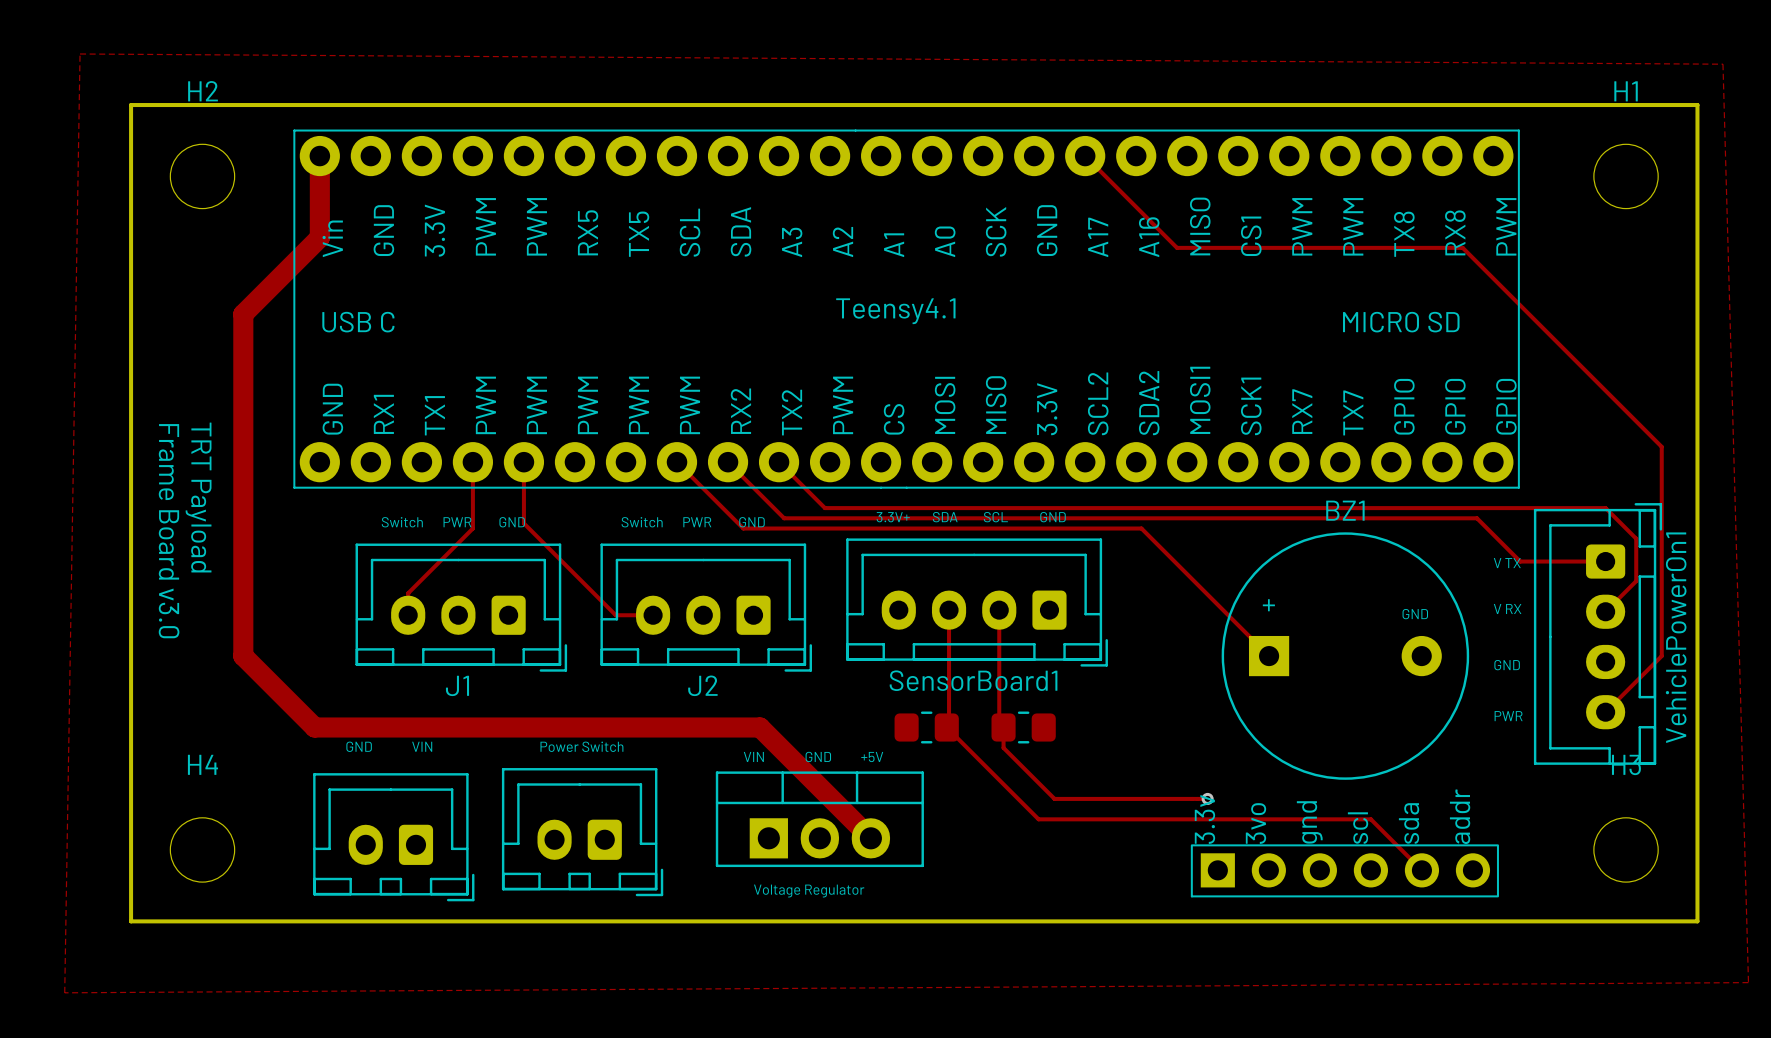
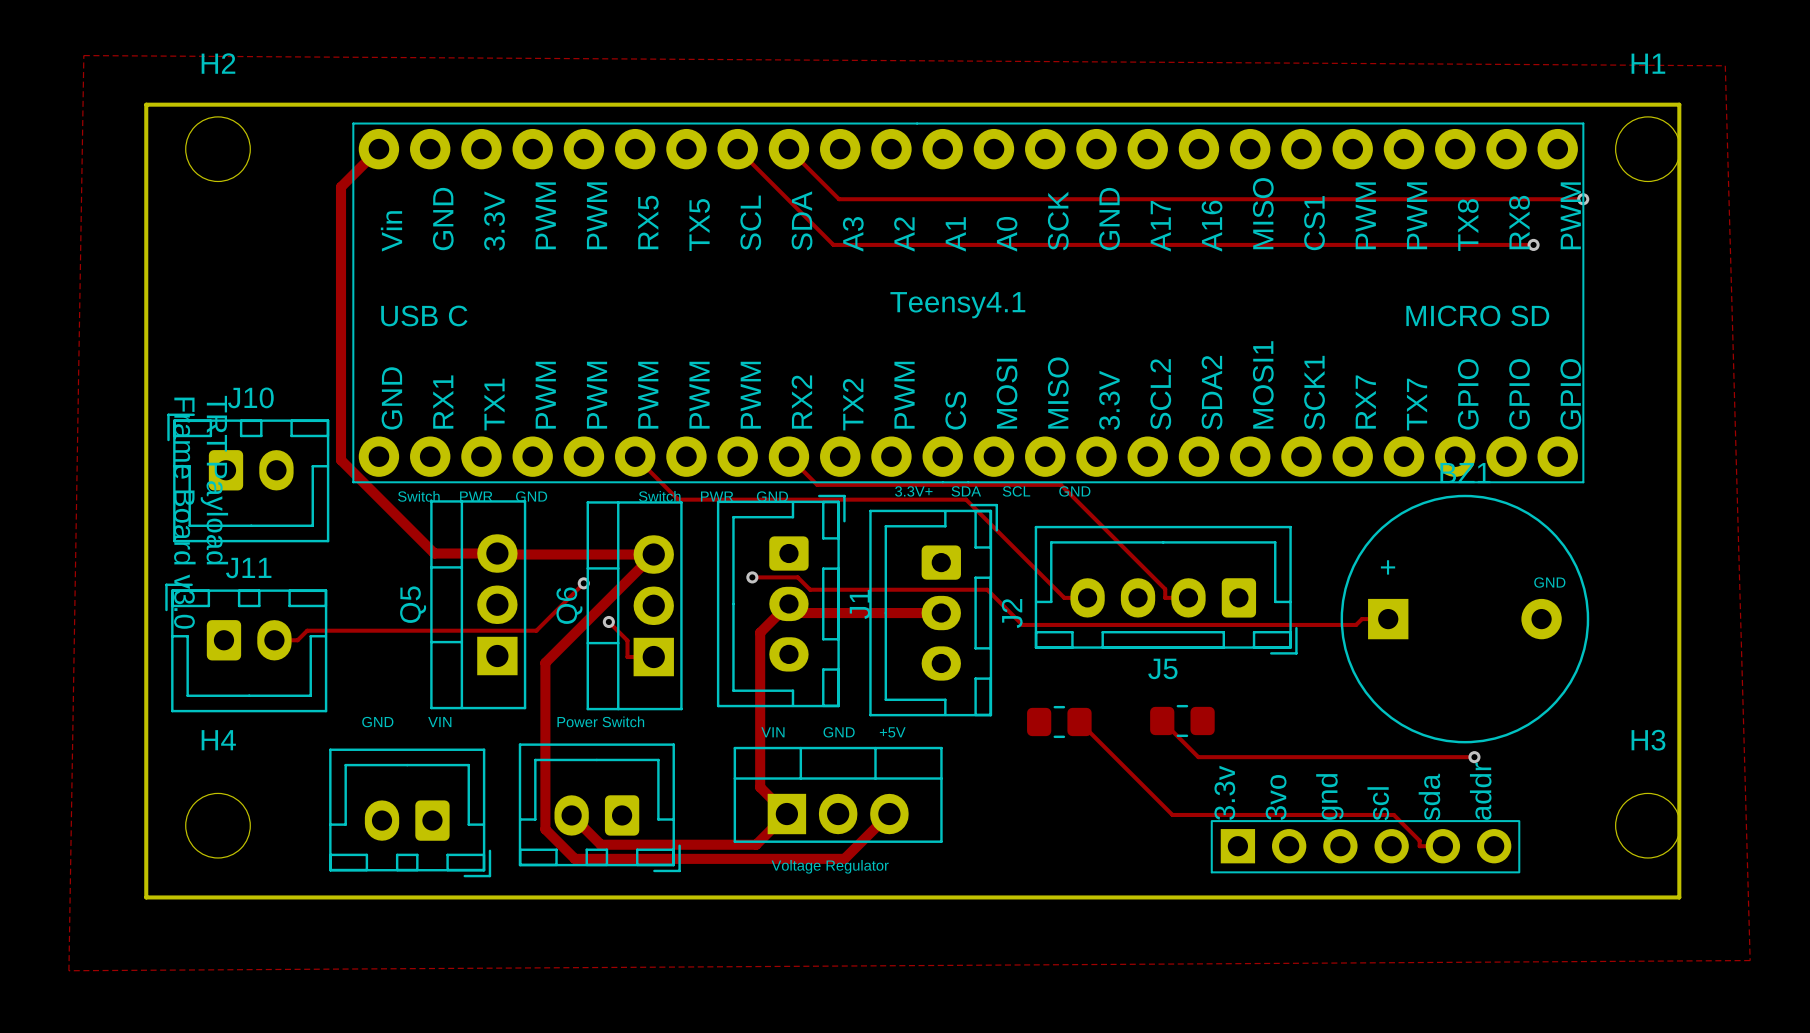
zone outline: (80, 53) (1722, 64) (1748, 982) (64, 992) (80, 53) -> (83, 55) (68, 970) (1750, 960) (1725, 65) (83, 55)
board edge: (131, 132) (131, 105) (1697, 105) (1697, 921) (1657, 921) -> (146, 104) (1679, 104) (1679, 897)
track: (319, 156) (319, 237) (243, 314) (243, 656) (314, 727) (760, 727) (870, 838) -> (378, 149) (341, 187) (341, 460) (434, 553) (653, 554) (545, 662) (545, 829) (574, 858) (844, 858) (889, 814)
track: (1085, 156) (1177, 247) (1462, 247) (1661, 446) (1661, 656) (1605, 712) -> none
track: none -> (737, 149) (833, 244) (1533, 244)
track: none -> (788, 149) (839, 199) (1583, 199)
via: none -> (1583, 199)
via: none -> (1533, 244)
Teensy4.1 position: (906, 309) -> (968, 302)
track: (472, 462) (472, 528) (408, 593) (408, 615) -> none
track: (523, 462) (523, 523) (615, 615) (653, 615) -> none
track: (677, 462) (743, 528) (1141, 528) (1269, 656) -> none
track: (728, 462) (784, 518) (1476, 518) (1520, 561) (1605, 561) -> none
track: (779, 462) (824, 508) (1605, 508) (1636, 538) (1636, 581) (1605, 611) -> none
track: none -> (635, 456) (678, 499) (966, 499) (1064, 597) (1087, 597)
track: none -> (788, 456) (817, 484) (1060, 484) (1165, 589) (1165, 597) (1188, 597)
J10: none -> (248, 477)
text: V TX (1507, 563) -> none
track: none -> (752, 577) (797, 577) (810, 589) (987, 589) (1022, 624) (1356, 624) (1361, 619) (1388, 619)
via: none -> (752, 577)
SensorBoard1: (977, 602) -> none
J1 rotation: 0° (461, 607) -> 90° counterclockwise (781, 601)
J1 position: (461, 607) -> (781, 601)
J2 rotation: 0° (706, 607) -> 90° counterclockwise (933, 610)
J2 position: (706, 607) -> (933, 610)
track: none -> (583, 583) (536, 630) (307, 630) (297, 640) (274, 640)
via: none -> (583, 583)
text: V RX (1507, 608) -> GND (1549, 582)
track: (949, 610) (949, 725) (946, 727) (1038, 819) (1370, 819) (1421, 870) -> (1079, 721) (1172, 814) (1393, 814) (1419, 840) (1419, 846) (1442, 846)
track: (999, 610) (999, 723) (1003, 727) (1003, 747) (1054, 798) (1207, 798) -> none
text: GND (1415, 614) -> none
J5: none -> (1166, 590)
Q5: none -> (478, 604)
Q6: none -> (634, 605)
VehiclePowerOn1: (1597, 633) -> none
track: none -> (941, 613) (803, 613) (794, 603) (788, 603) (760, 632) (760, 787) (786, 814) (756, 844) (600, 844) (571, 815)
track: none -> (608, 621) (627, 640) (627, 657) (653, 657)
via: none -> (608, 621)
BZ1 position: (1345, 656) -> (1464, 619)
text: GND (1507, 665) -> none
J11: none -> (246, 647)
text: PWR (1508, 716) -> none
part: (926, 727) -> none
part position: (1023, 727) -> (1059, 721)
track: none -> (1162, 720) (1198, 757) (1474, 757)
part: none -> (1182, 720)
via: none -> (1474, 757)
via: (1207, 798) -> none

